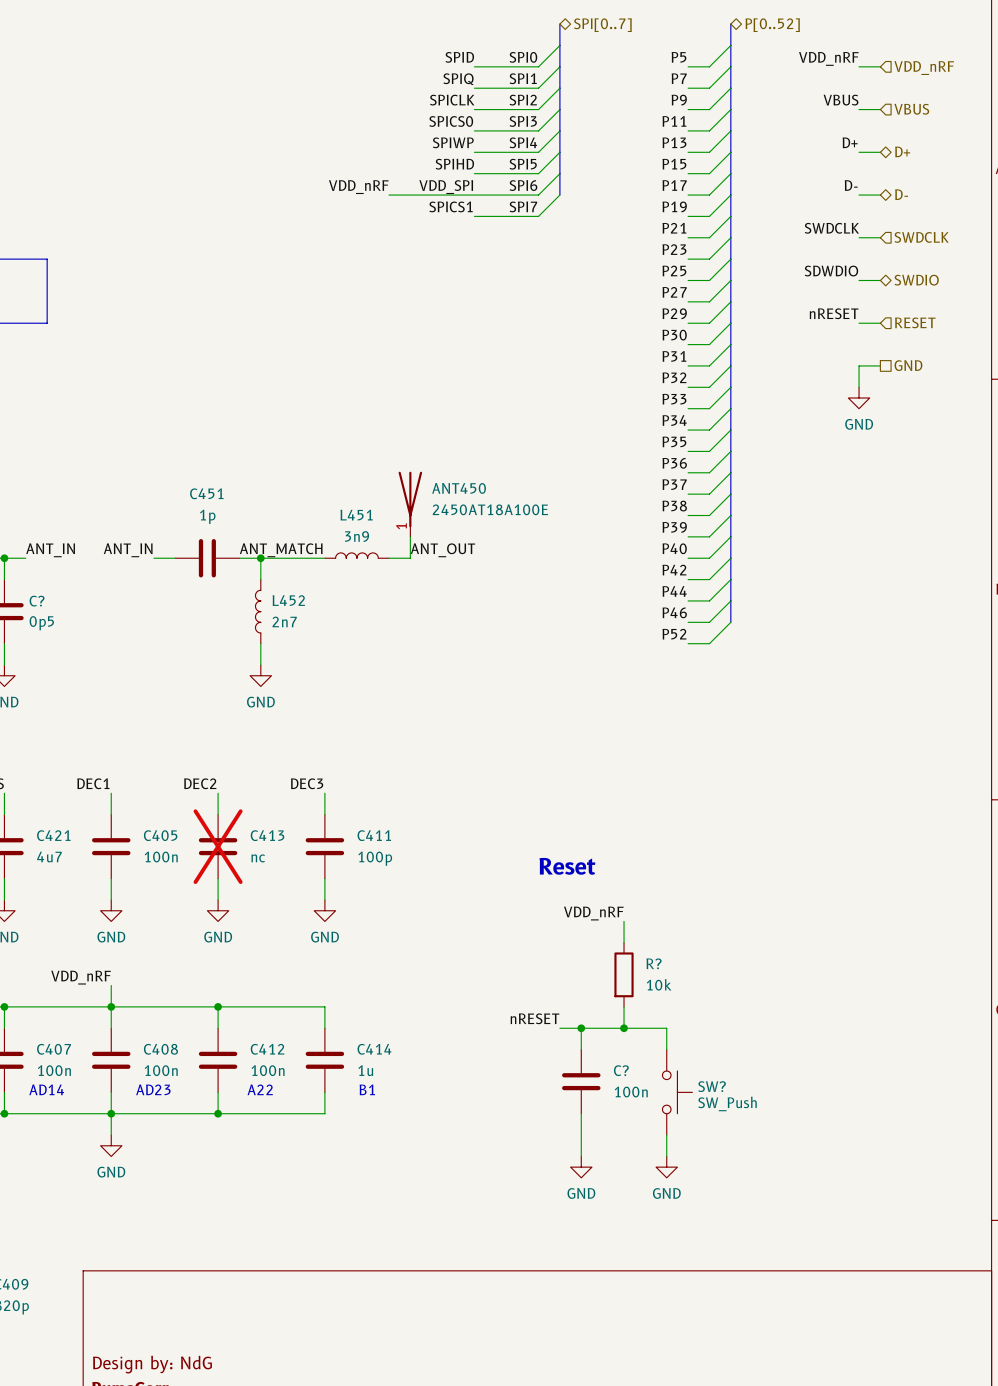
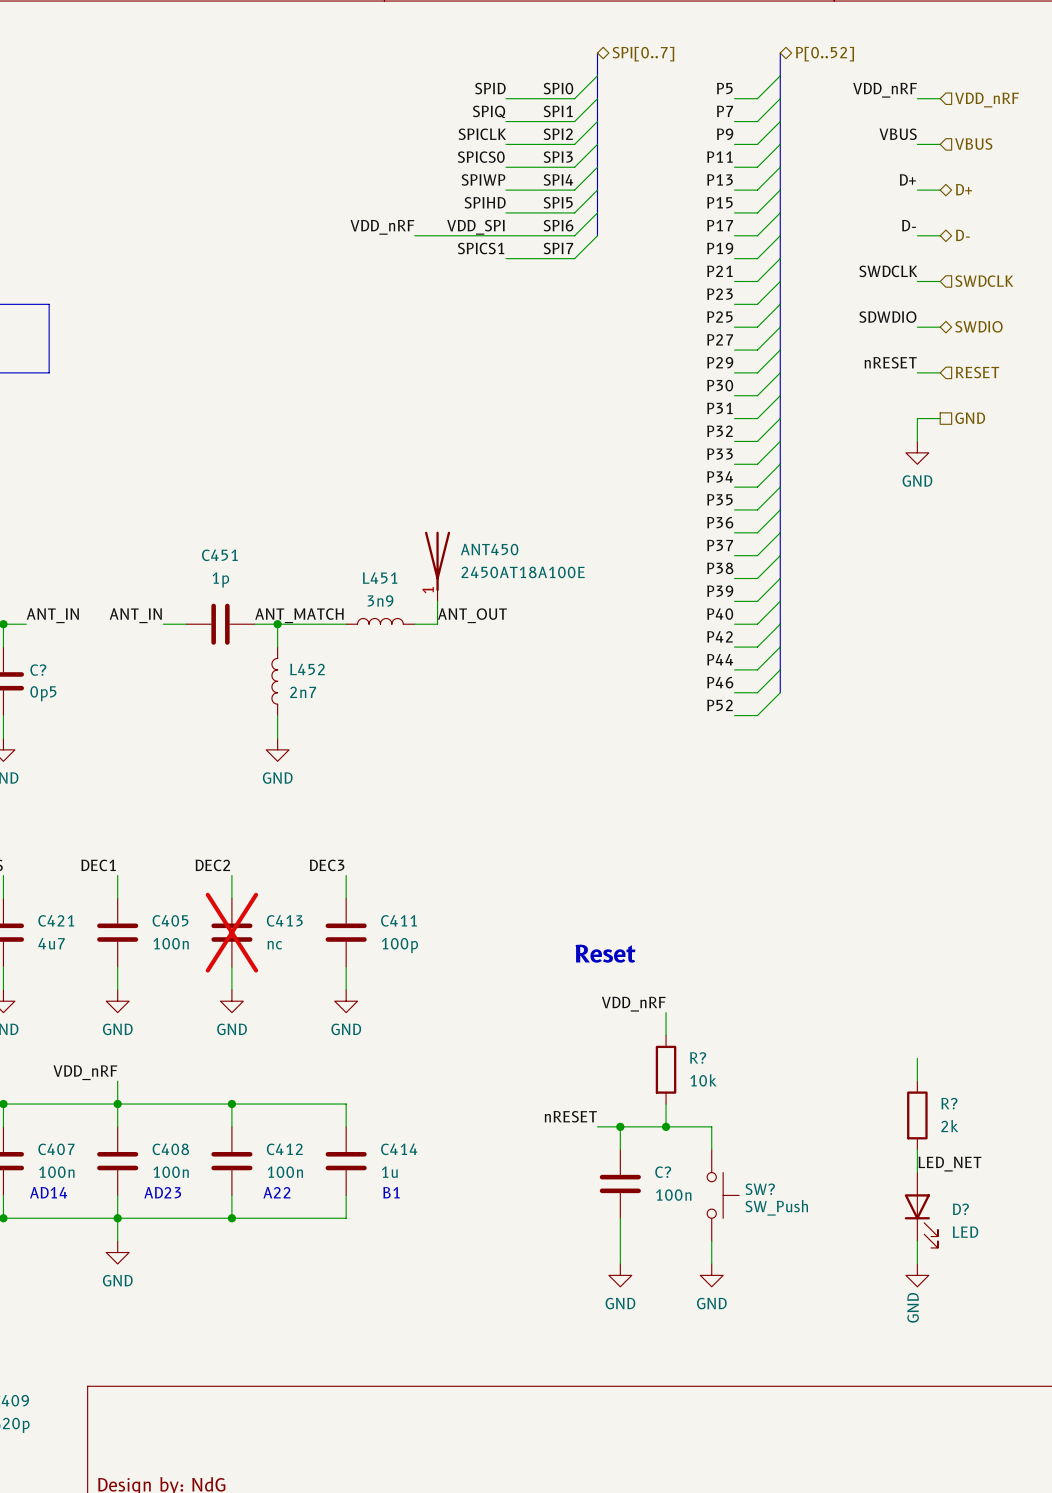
wire: none -> (917, 1058) (917, 1081)
R?: none -> 2k (917, 1115)
wire: none -> (917, 1149) (917, 1172)
label: none -> LED_NET (949, 1164)
D?: none -> LED (921, 1210)
wire: none -> (917, 1241) (917, 1263)
power symbol: none -> GND (917, 1275)

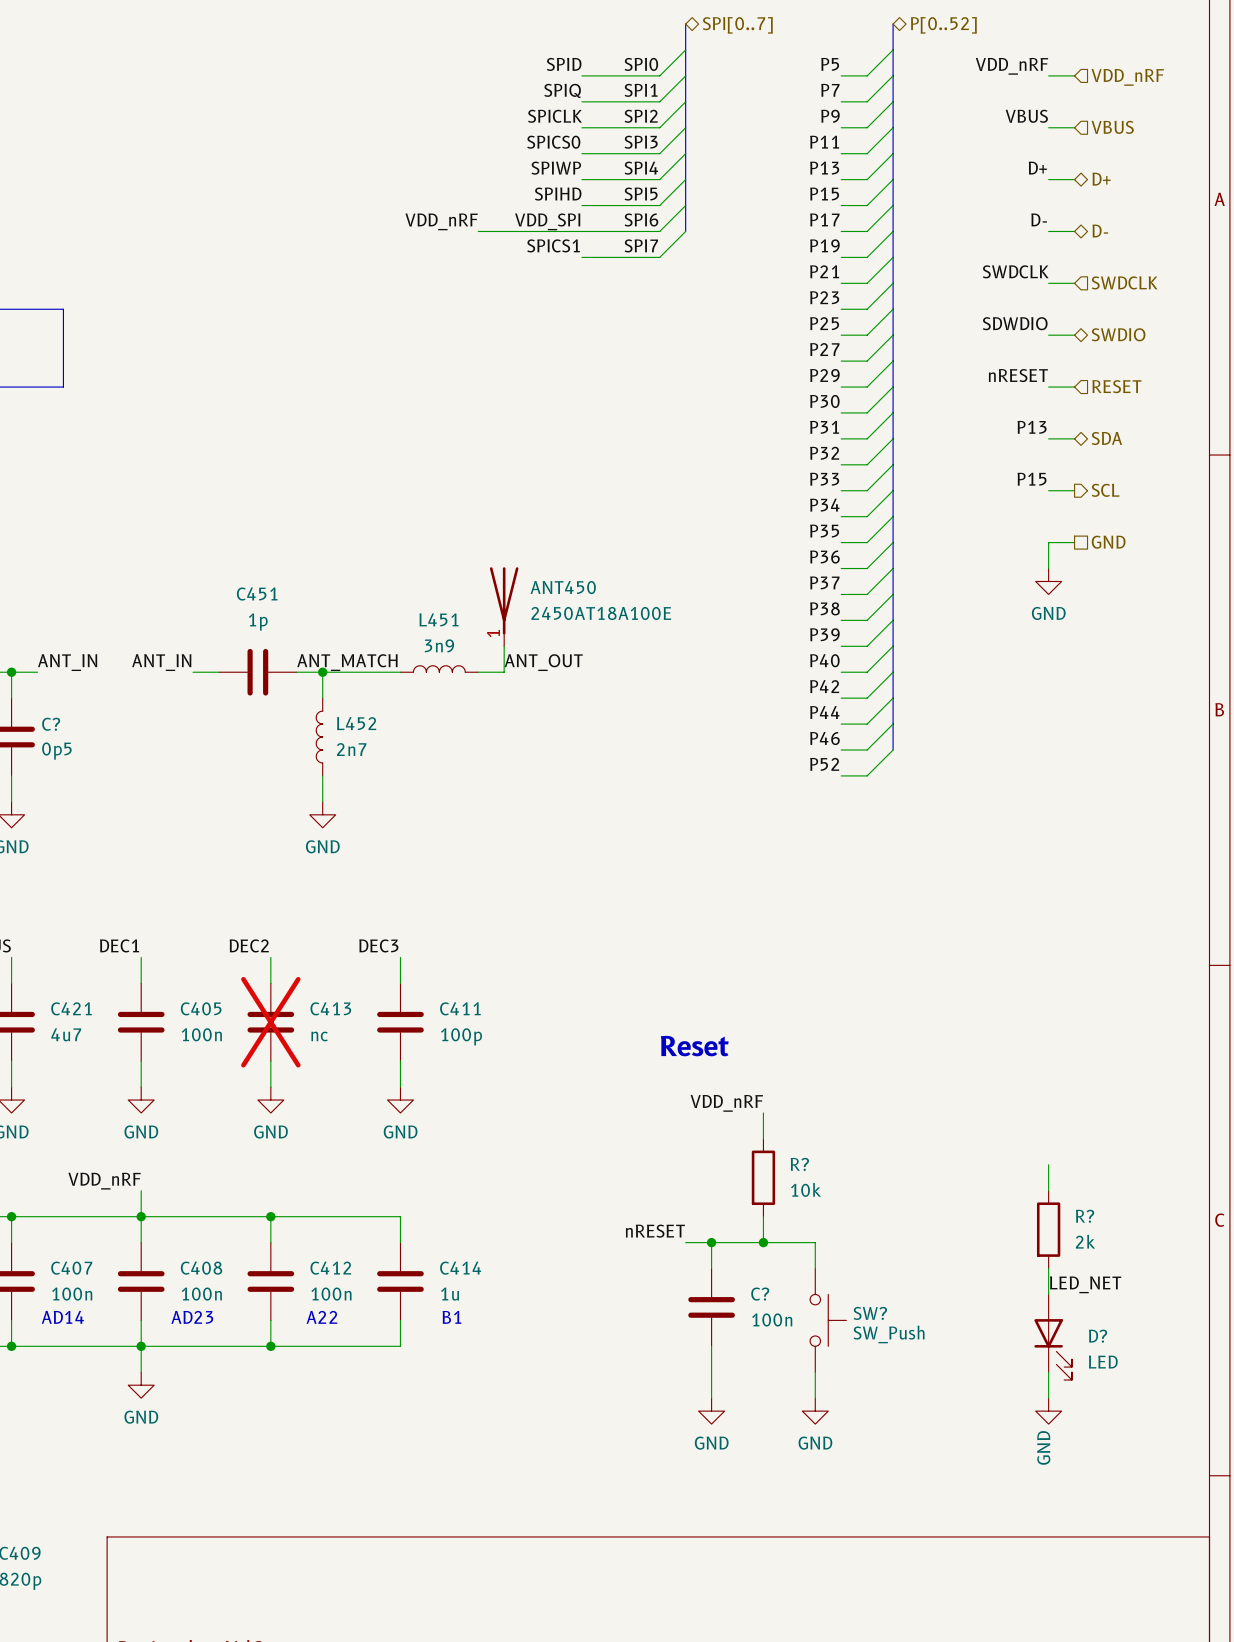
label: none -> P13 (1032, 427)
wire: (917, 418) (917, 441) -> none
hierarchical label shape: passive (970, 418) -> bidirectional (1106, 438)
hierarchical label: GND (970, 418) -> SDA (1106, 438)
power symbol position: GND (917, 452) -> GND (1048, 581)
label: none -> P15 (1032, 479)
hierarchical label: none -> SCL (1105, 490)
wire: none -> (1048, 490) (1074, 490)
wire: none -> (1074, 542) (1048, 542) (1048, 568)
hierarchical label: none -> GND (1108, 542)

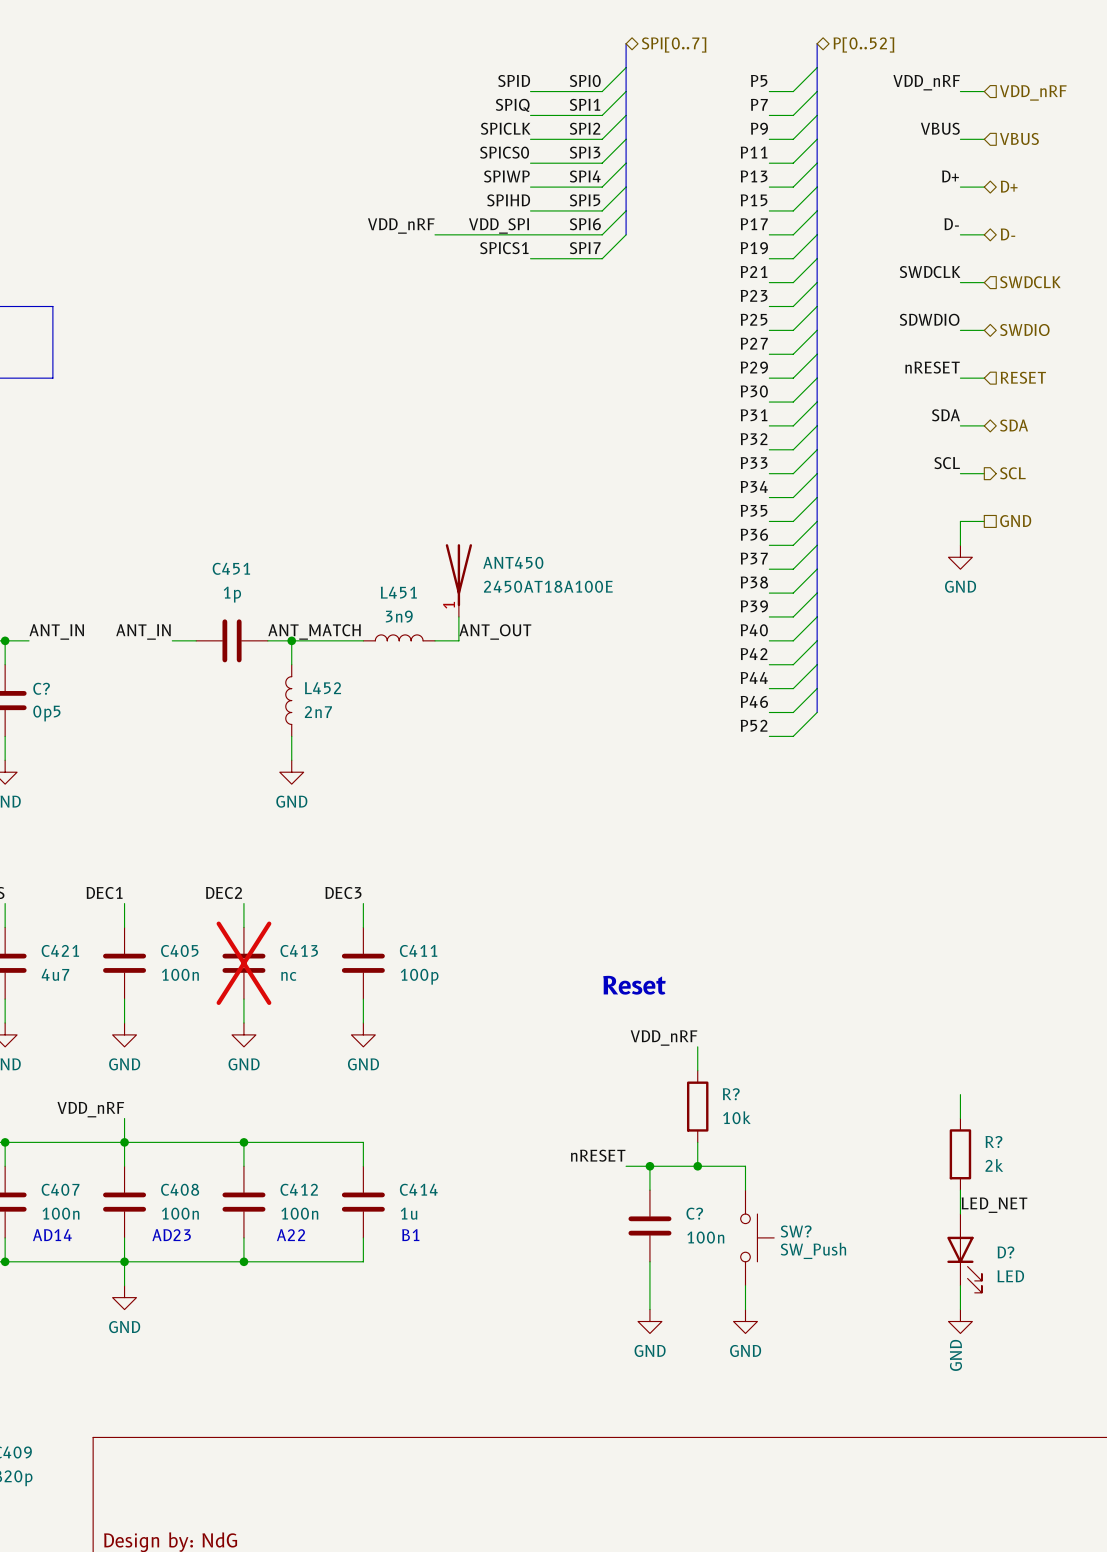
label: P13 (1032, 427) -> SDA (945, 415)
label: P15 (1032, 479) -> SCL (947, 463)

